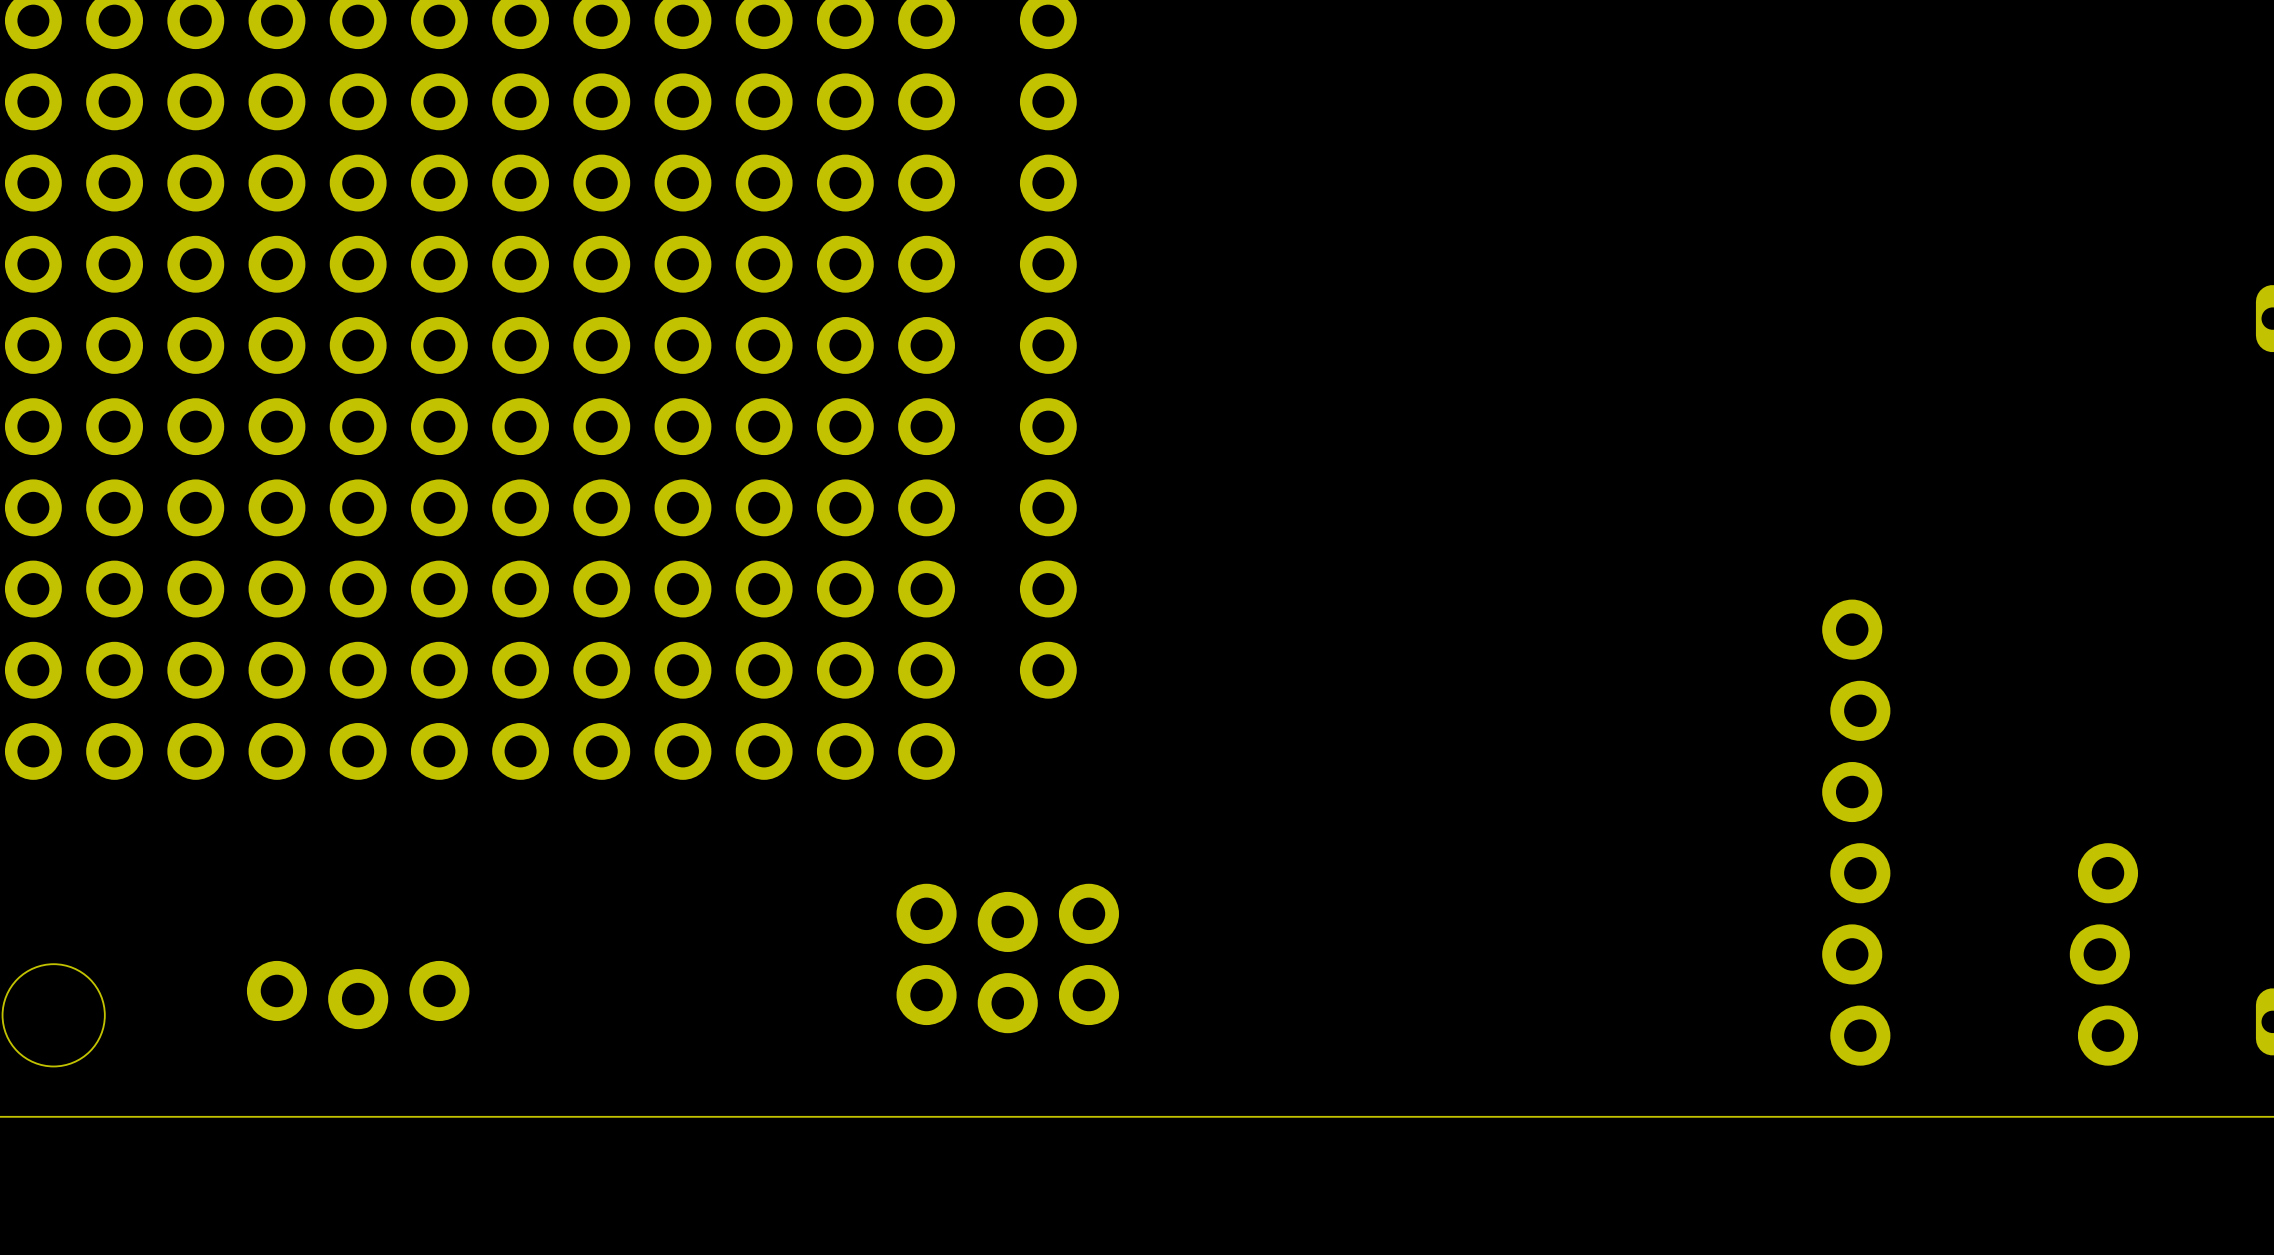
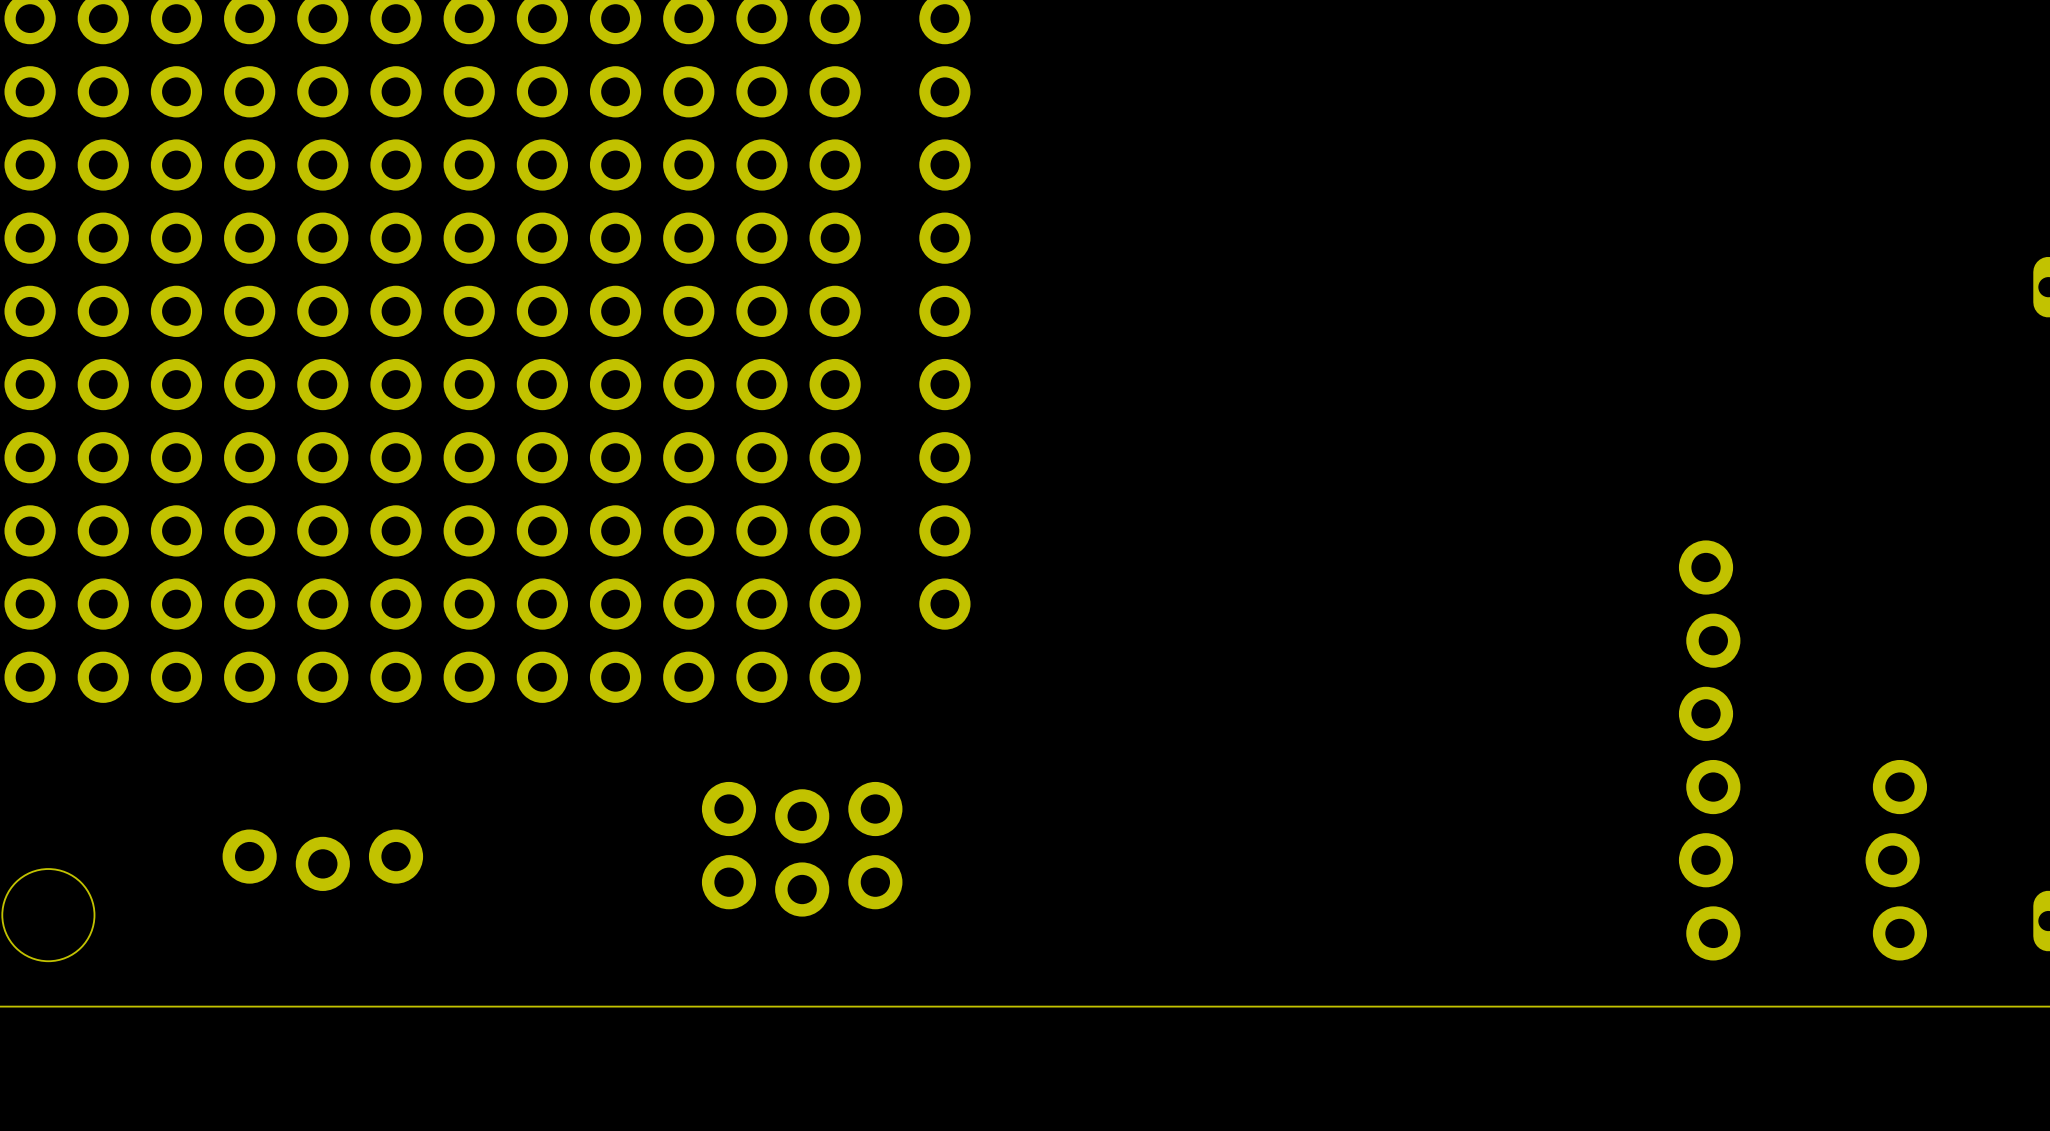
part position: (1856, 832) -> (1709, 750)
part position: (1007, 958) -> (802, 849)
part position: (358, 995) -> (322, 860)

